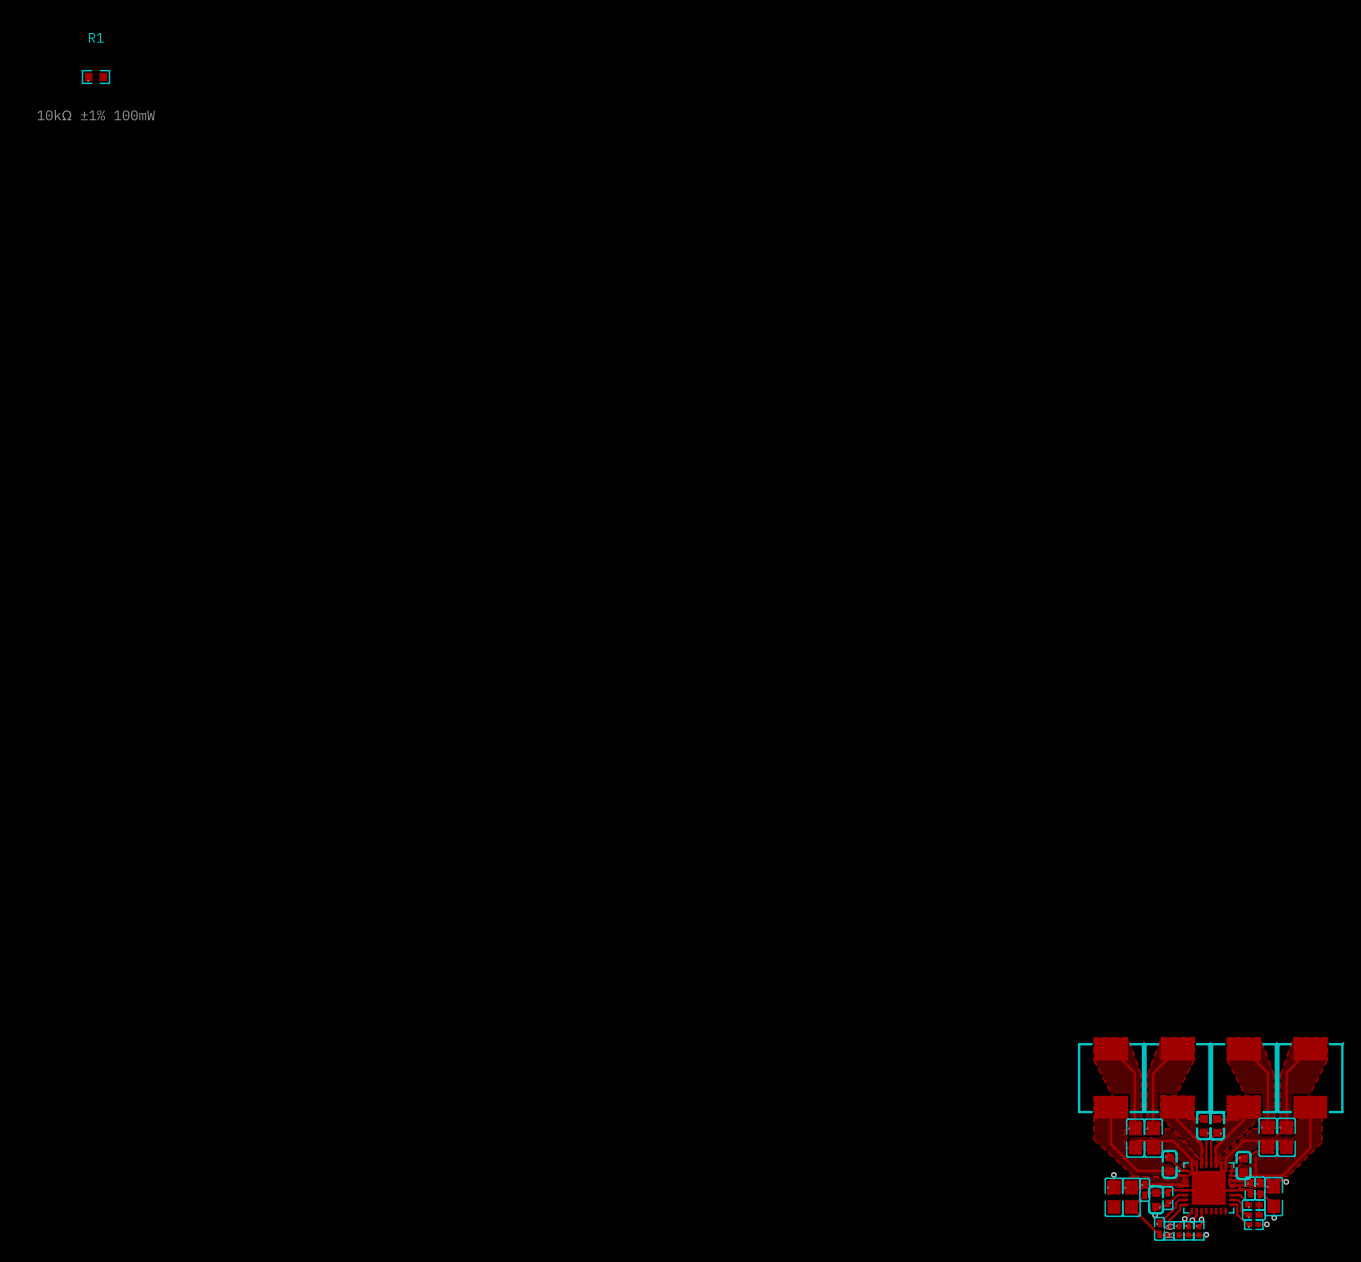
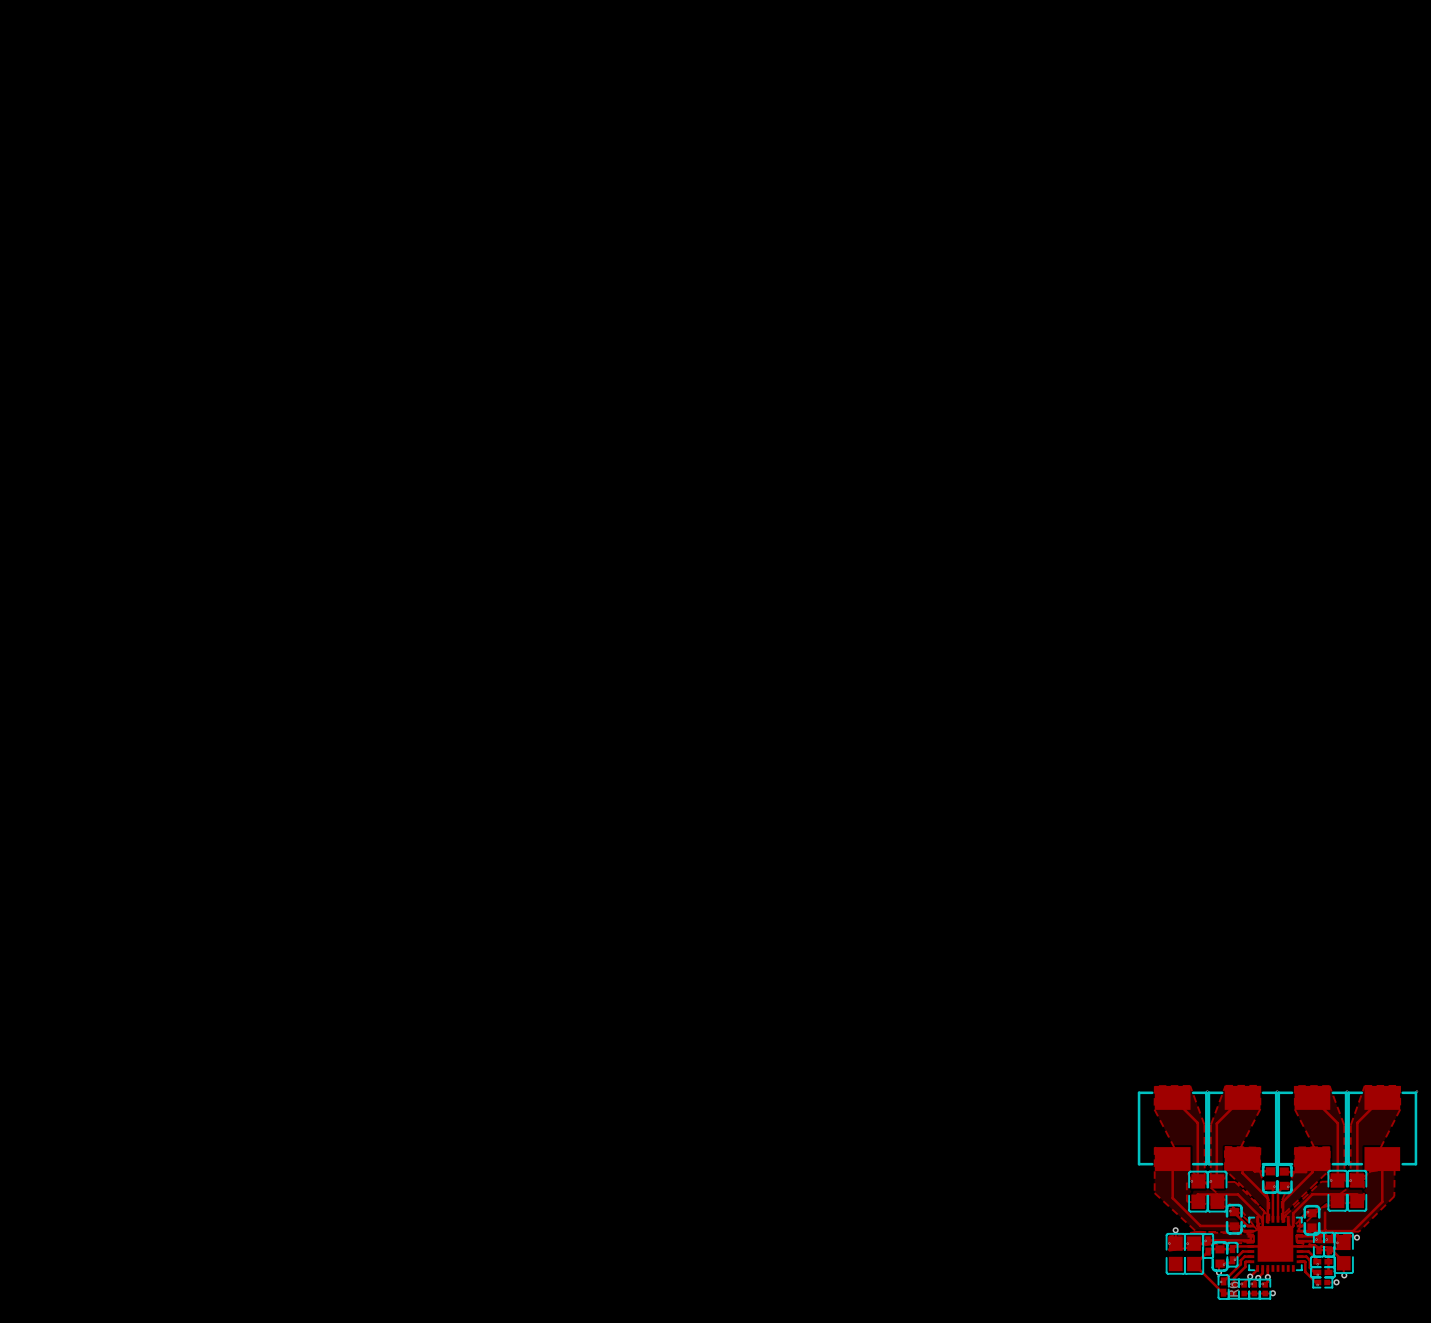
R1: 10kΩ ±1% 100mW (95, 76) -> none

